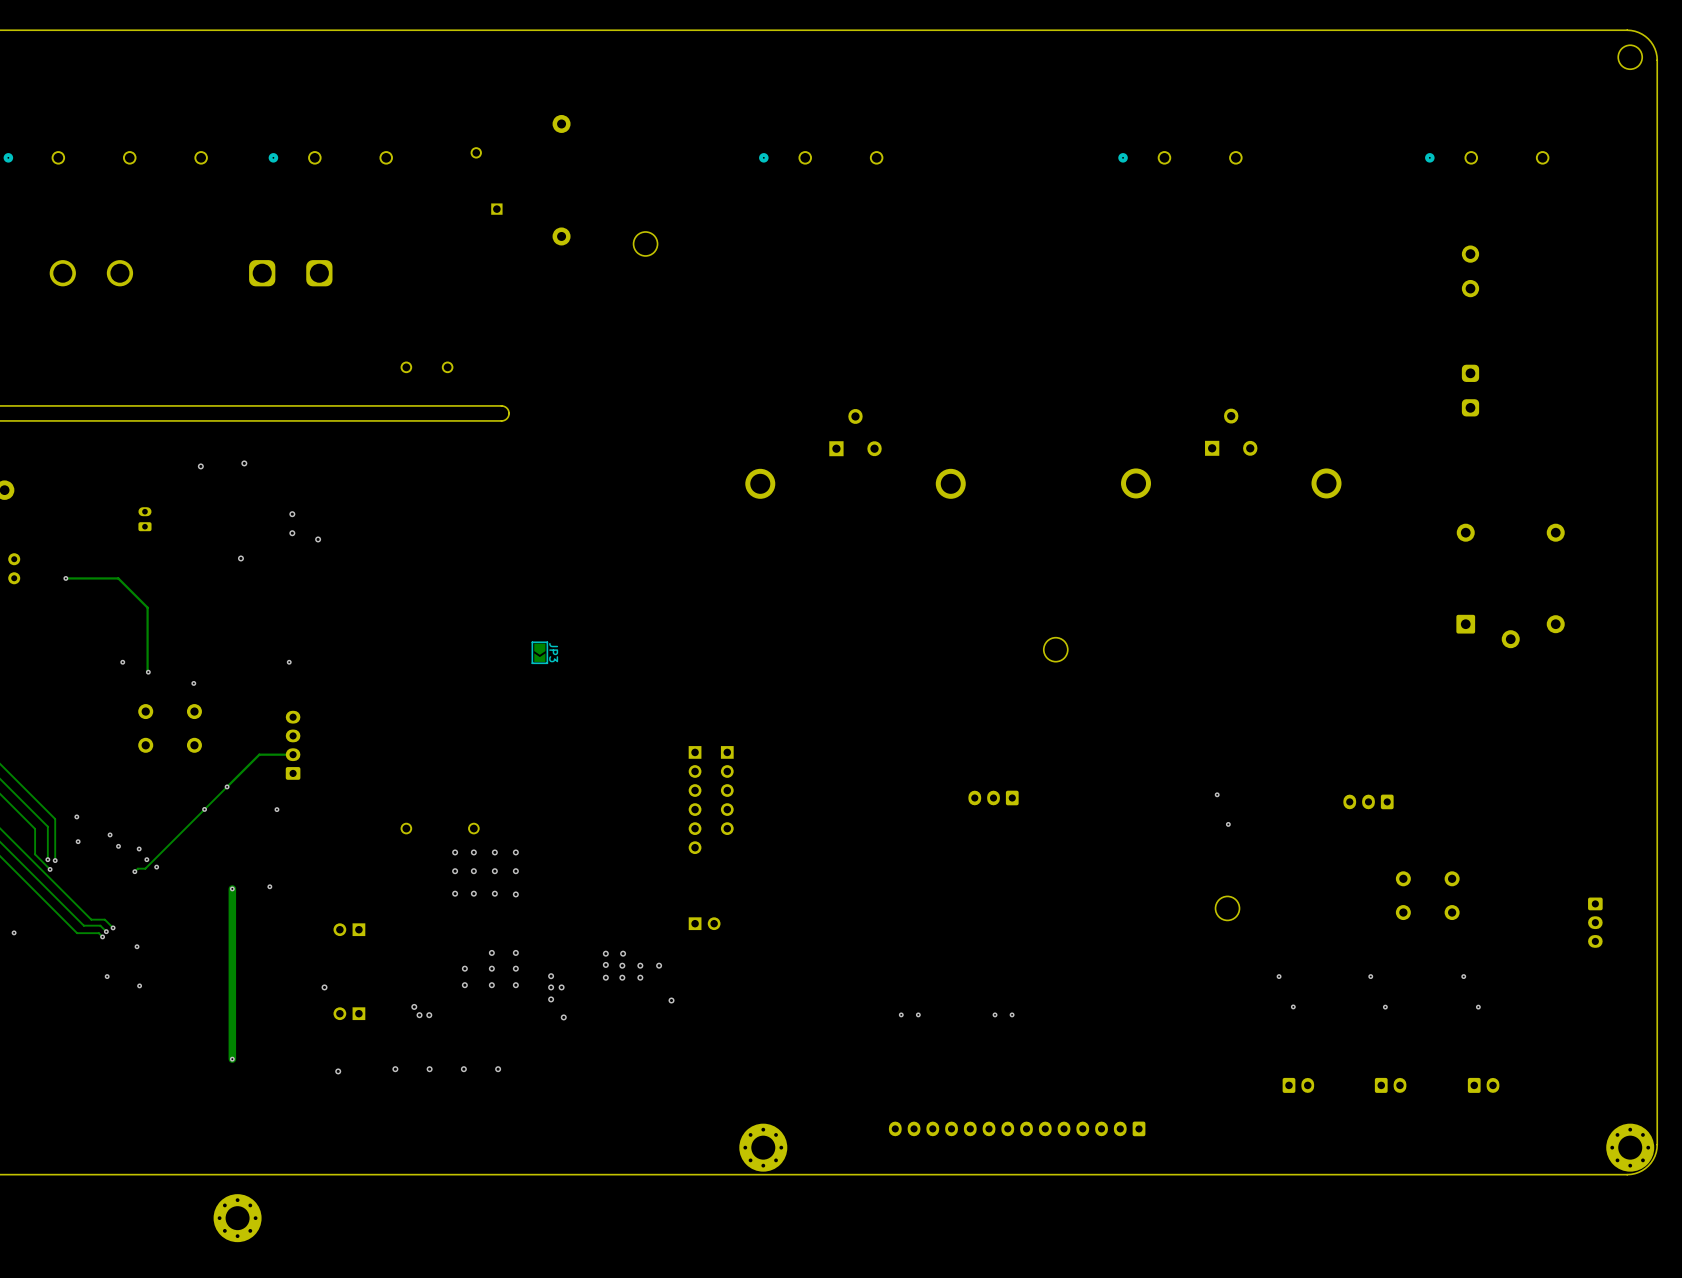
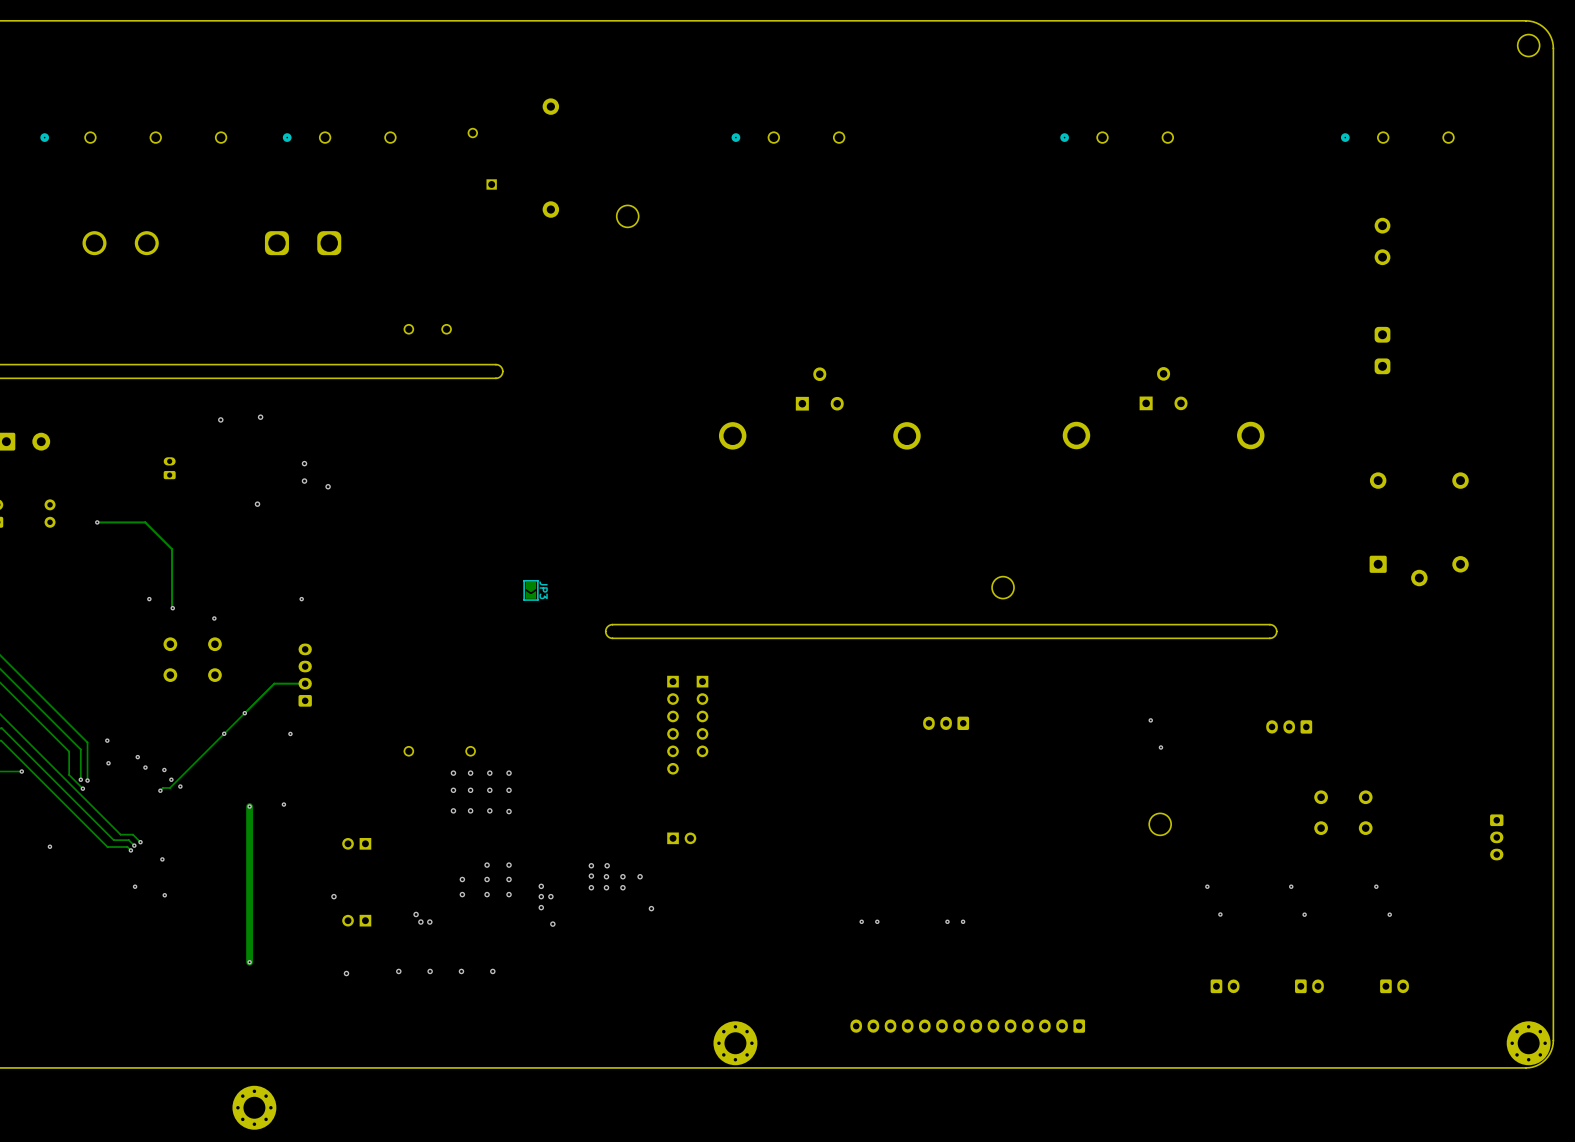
board edge: none -> (1269, 624) (612, 624) (607, 626) (605, 631) (607, 636) (612, 638) (1269, 638) (1274, 636) (1276, 631) (1274, 626) (1269, 624)

